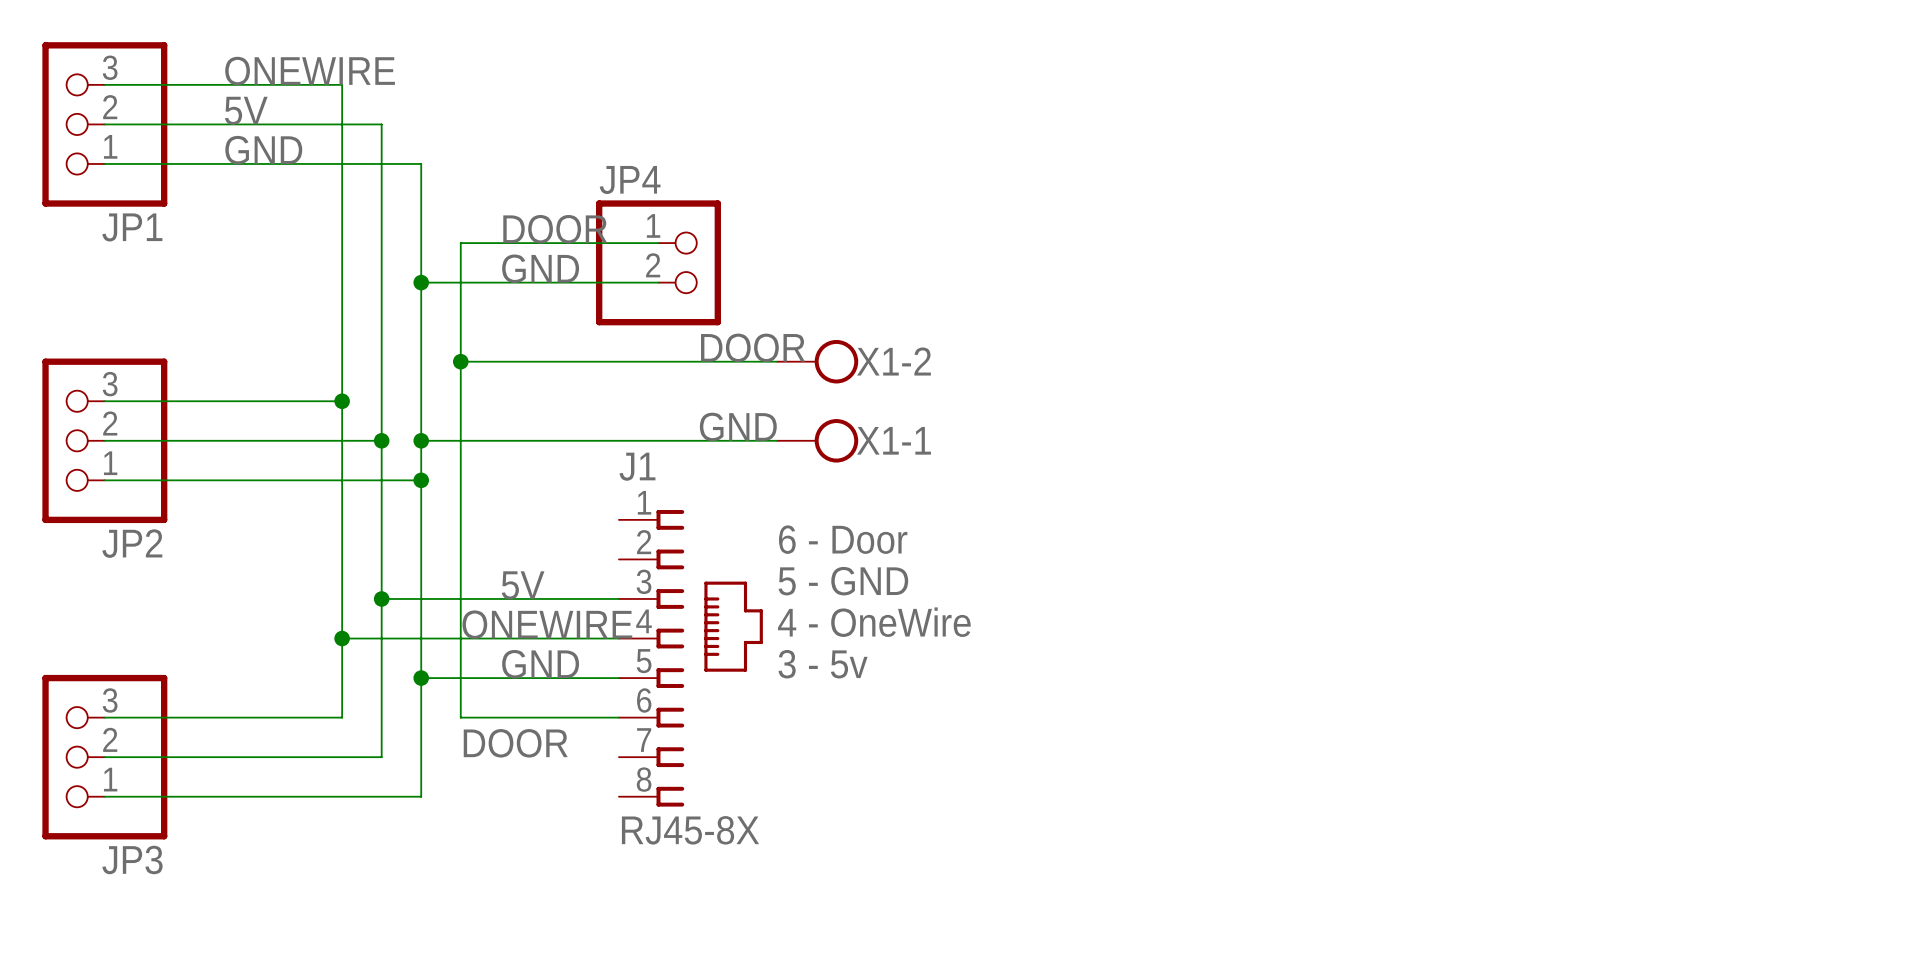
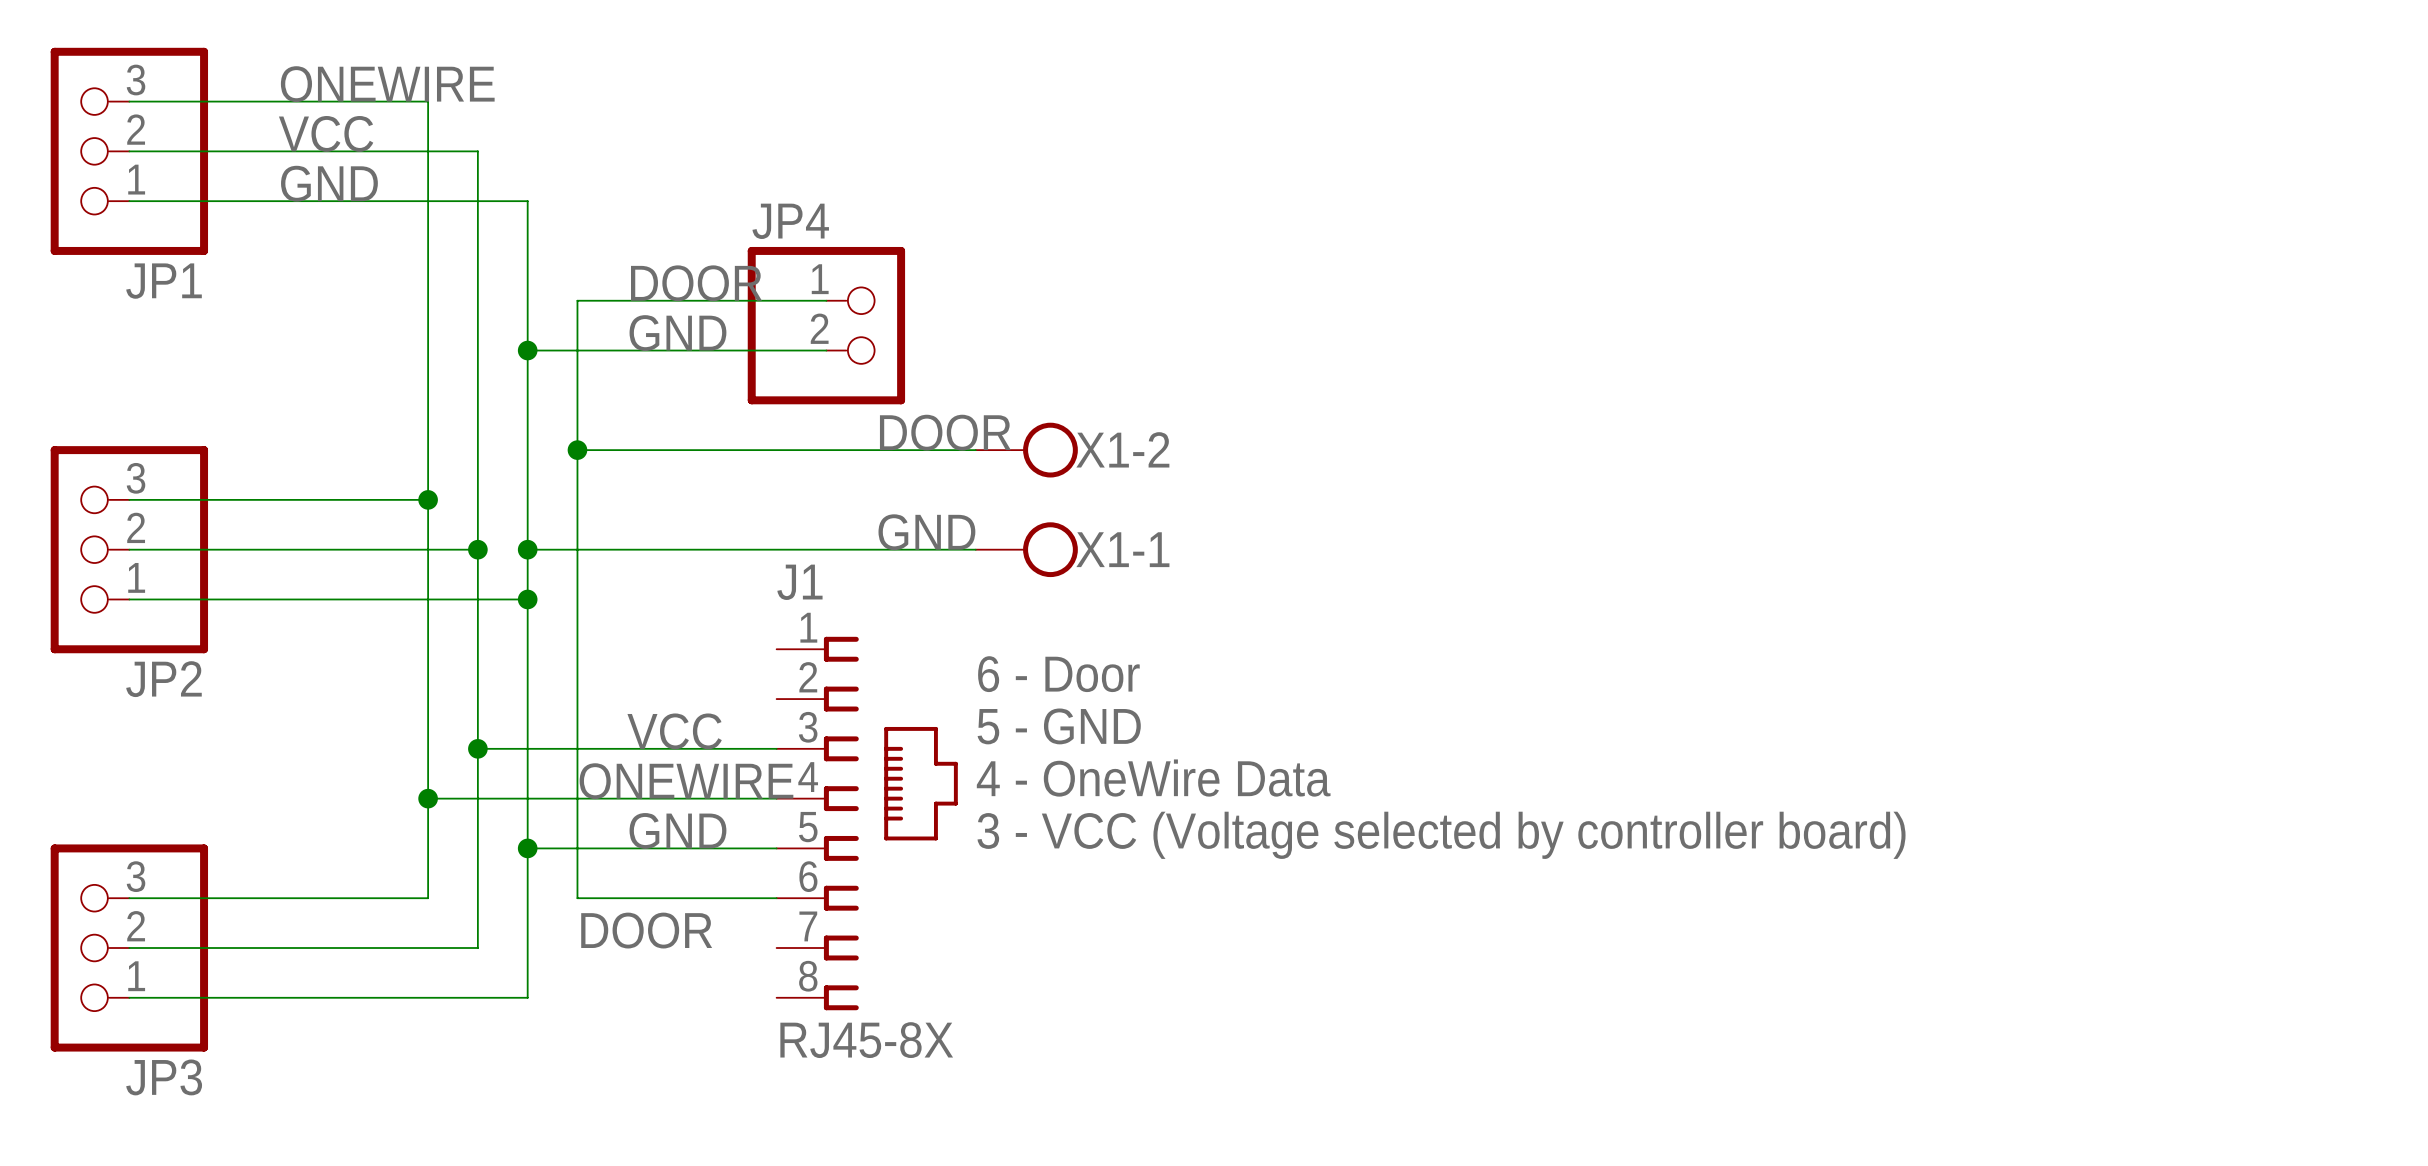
label: 5V (246, 110) -> VCC (326, 133)
label: 5V (523, 585) -> VCC (674, 731)
text: 4 - OneWire (874, 622) -> 4 - OneWire Data (1153, 778)
text: 3 - 5v (823, 664) -> 3 - VCC (Voltage selected by controller board) (1441, 835)

